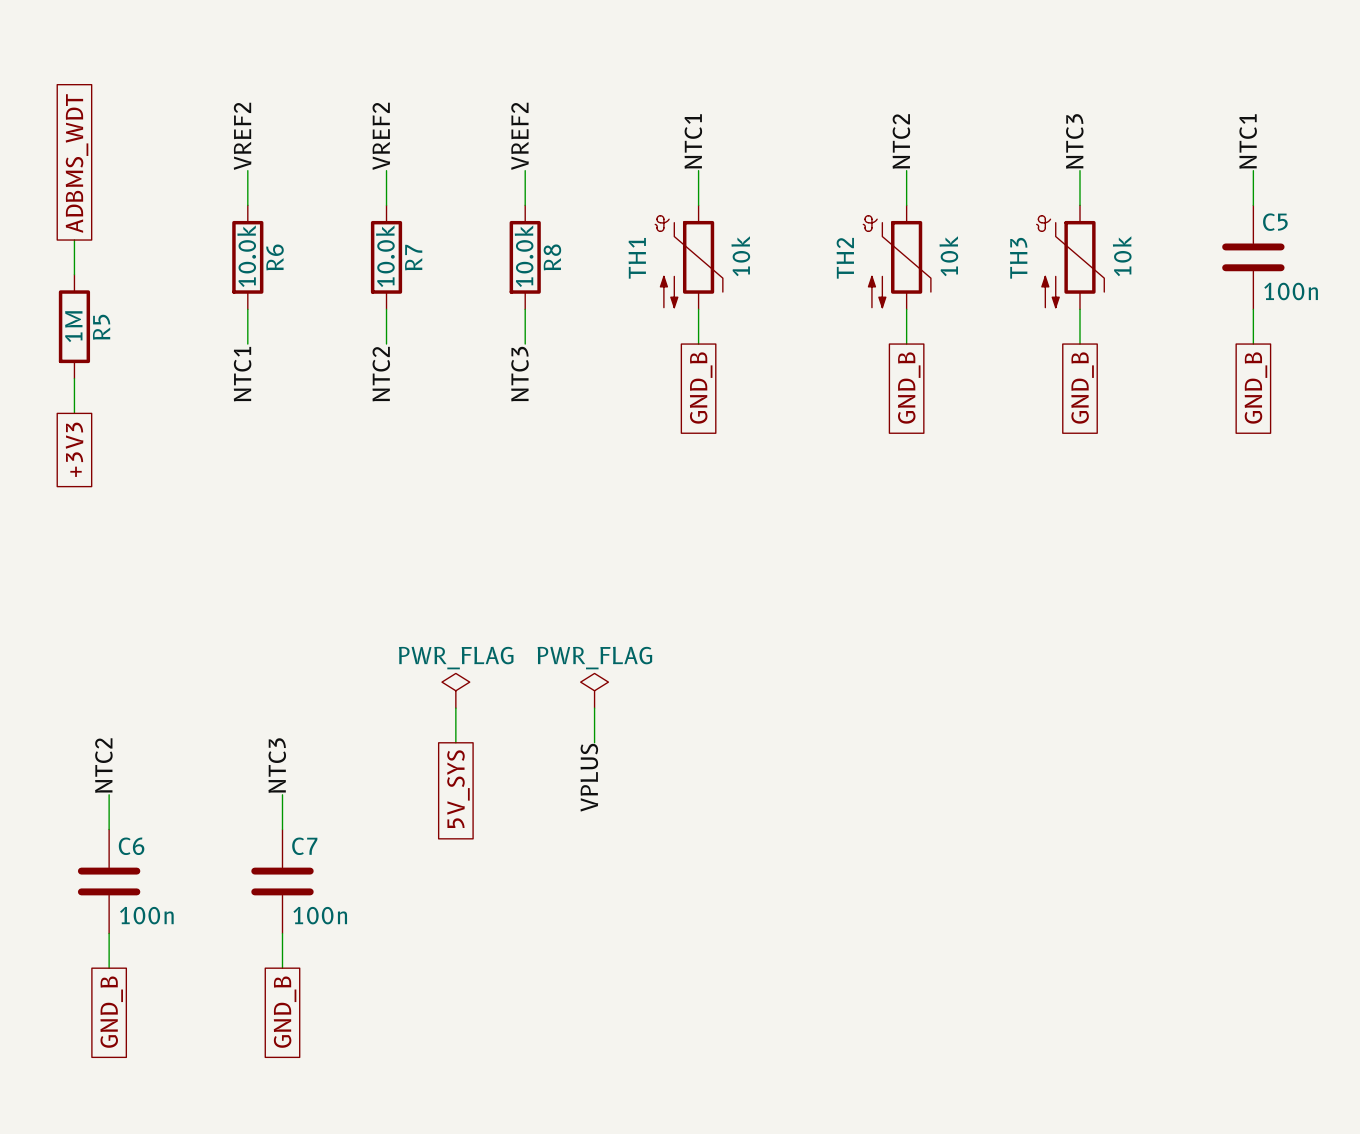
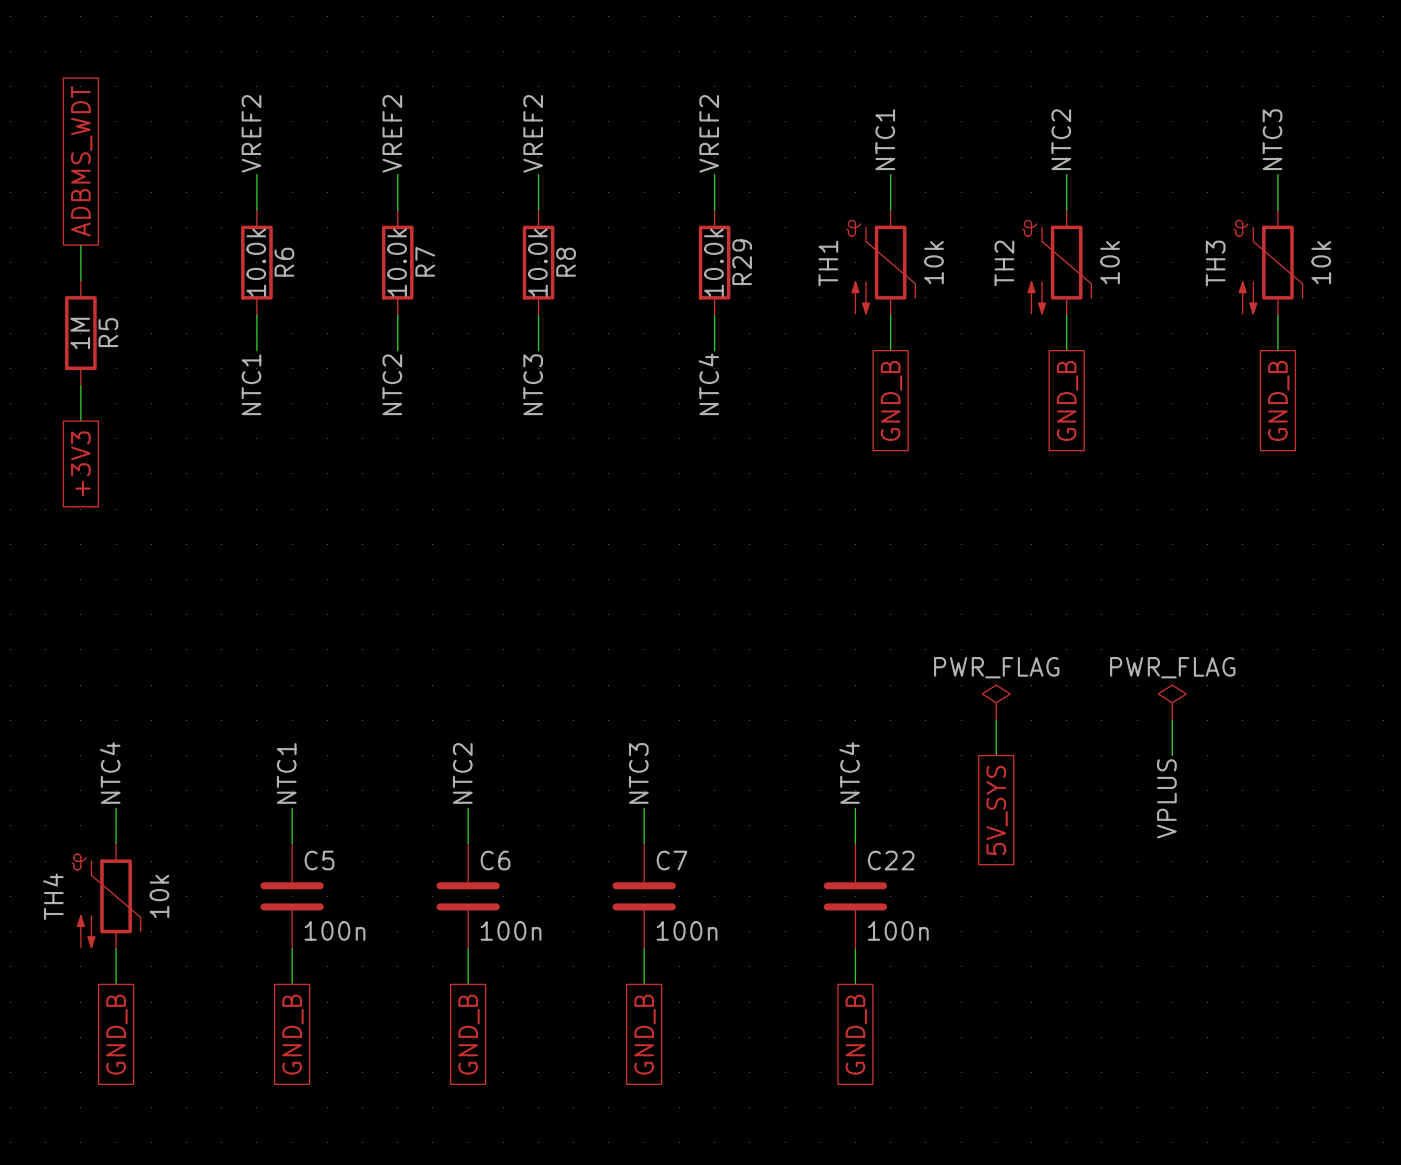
label: NTC1 (693, 141) -> VREF2 (709, 133)
label: none -> NTC1 (885, 139)
label position: NTC2 (901, 141) -> NTC2 (1061, 139)
label: NTC3 (1074, 141) -> none
label: NTC1 (1248, 141) -> NTC3 (1272, 139)
wire: (906, 170) (906, 205) -> (890, 174) (890, 209)
wire: (1079, 170) (1079, 205) -> (1066, 174) (1066, 209)
TH1 position: (689, 257) -> (880, 262)
R29: none -> 10.0k (714, 262)
TH2 position: (897, 257) -> (1057, 262)
TH3 position: (1070, 257) -> (1268, 262)
C5: 100n (1253, 257) -> none
wire: (906, 309) (906, 344) -> (890, 315) (890, 350)
wire: (1079, 309) (1079, 344) -> (1066, 315) (1066, 350)
label: none -> NTC4 (708, 384)
global label: GND_B (701, 388) -> none
global label position: GND_B (909, 388) -> GND_B (891, 400)
global label position: GND_B (1082, 388) -> GND_B (1067, 400)
power symbol: PWR_FLAG (455, 690) -> none
power symbol: PWR_FLAG (594, 690) -> none
power symbol: none -> PWR_FLAG (996, 702)
power symbol: none -> PWR_FLAG (1172, 702)
wire: (455, 708) (455, 742) -> (468, 808) (468, 843)
wire: (594, 708) (594, 742) -> (644, 808) (644, 843)
wire: none -> (996, 720) (996, 755)
wire: none -> (1172, 720) (1172, 755)
label: NTC2 (103, 765) -> NTC4 (110, 773)
label: NTC3 (277, 765) -> NTC1 (286, 773)
label: none -> NTC2 (462, 773)
label: none -> NTC3 (638, 773)
label: none -> NTC4 (849, 773)
label: VPLUS (589, 777) -> none
label: none -> VPLUS (1166, 798)
global label: 5V_SYS (458, 789) -> none
global label: none -> 5V_SYS (997, 810)
wire: none -> (855, 808) (855, 843)
C7 name: C7 (304, 846) -> C5 (319, 860)
TH4: none -> 10k (106, 896)
C6 position: (109, 881) -> (468, 896)
C7: none -> 100n (644, 896)
C22: none -> 100n (855, 896)
wire: none -> (468, 949) (468, 984)
wire: none -> (644, 949) (644, 984)
wire: none -> (855, 949) (855, 984)
global label: none -> GND_B (468, 1034)
global label: none -> GND_B (645, 1034)
global label: none -> GND_B (856, 1034)

